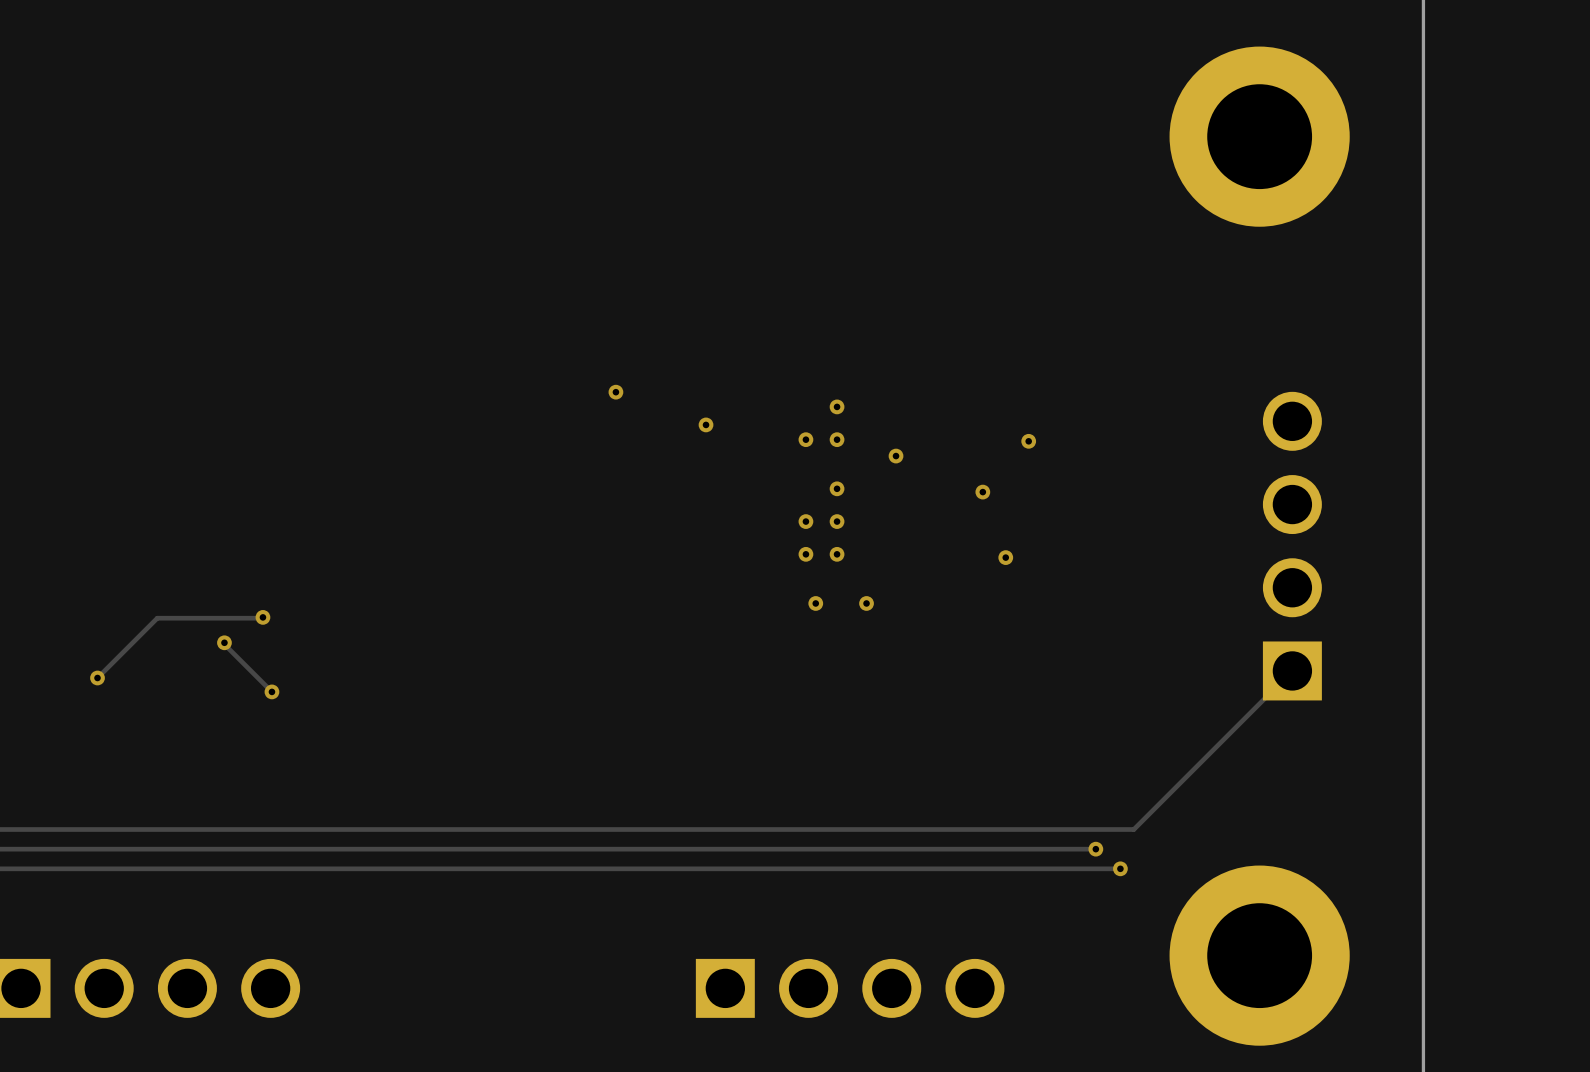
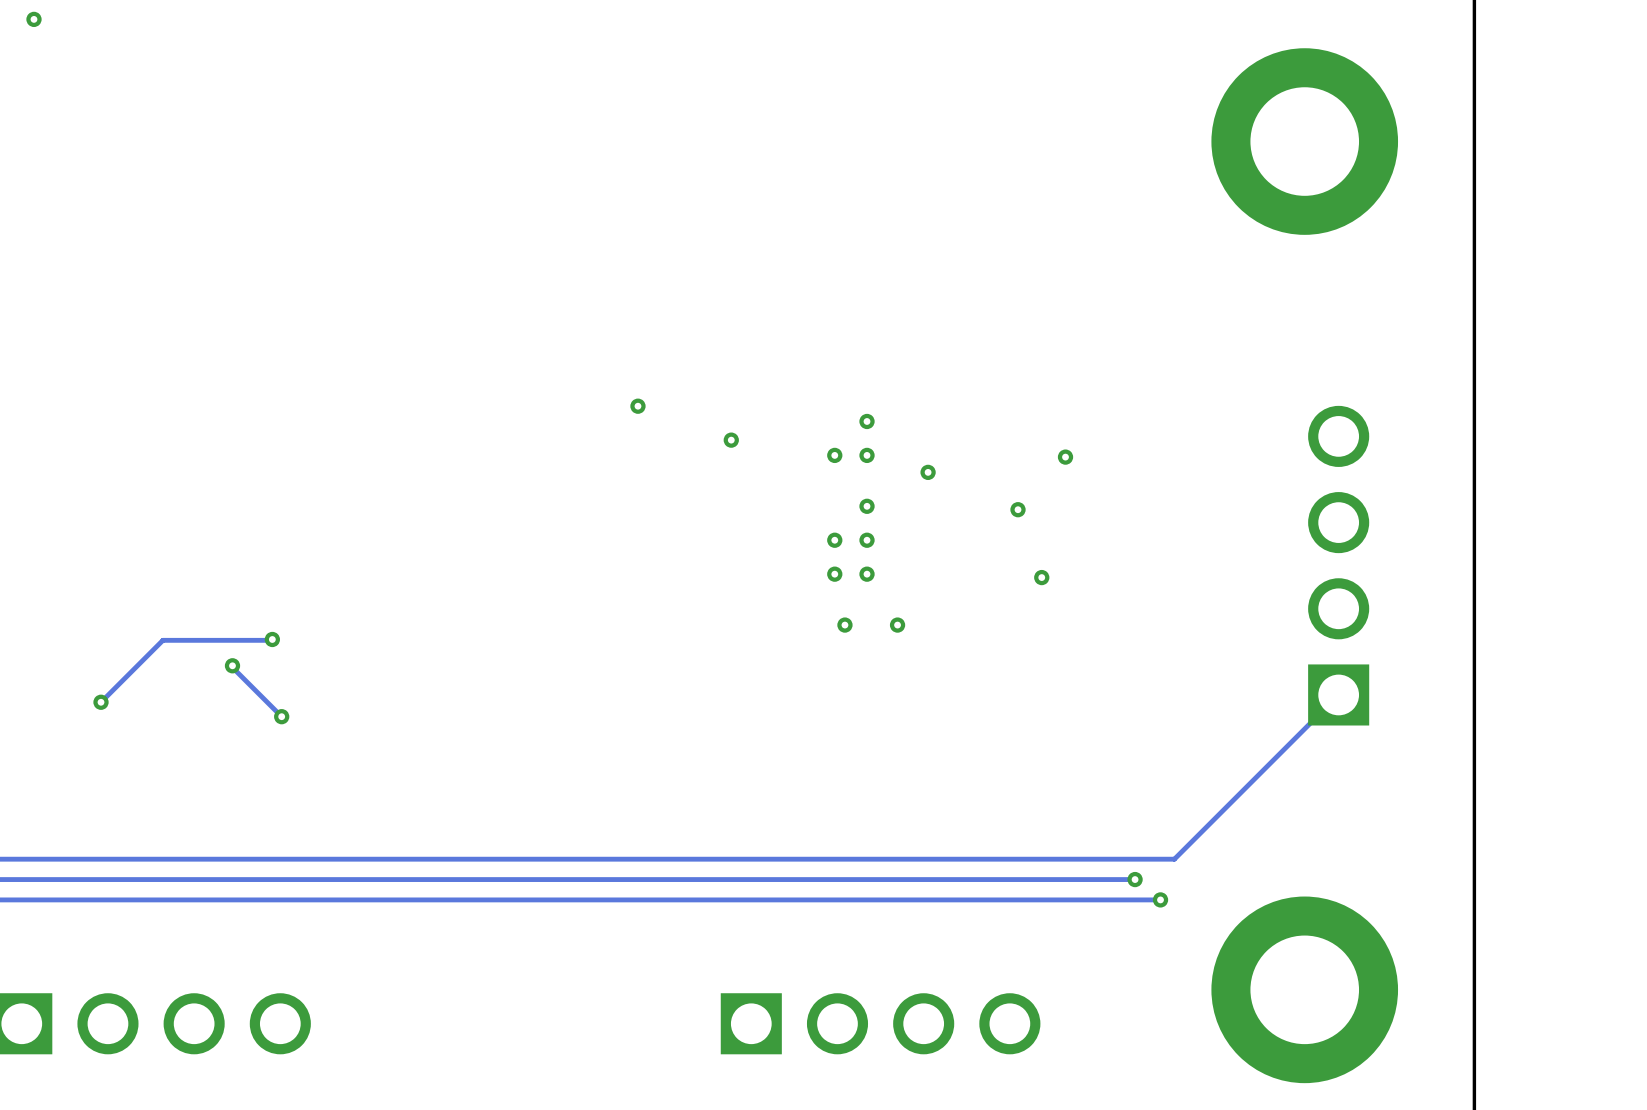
via: none -> (33, 19)

